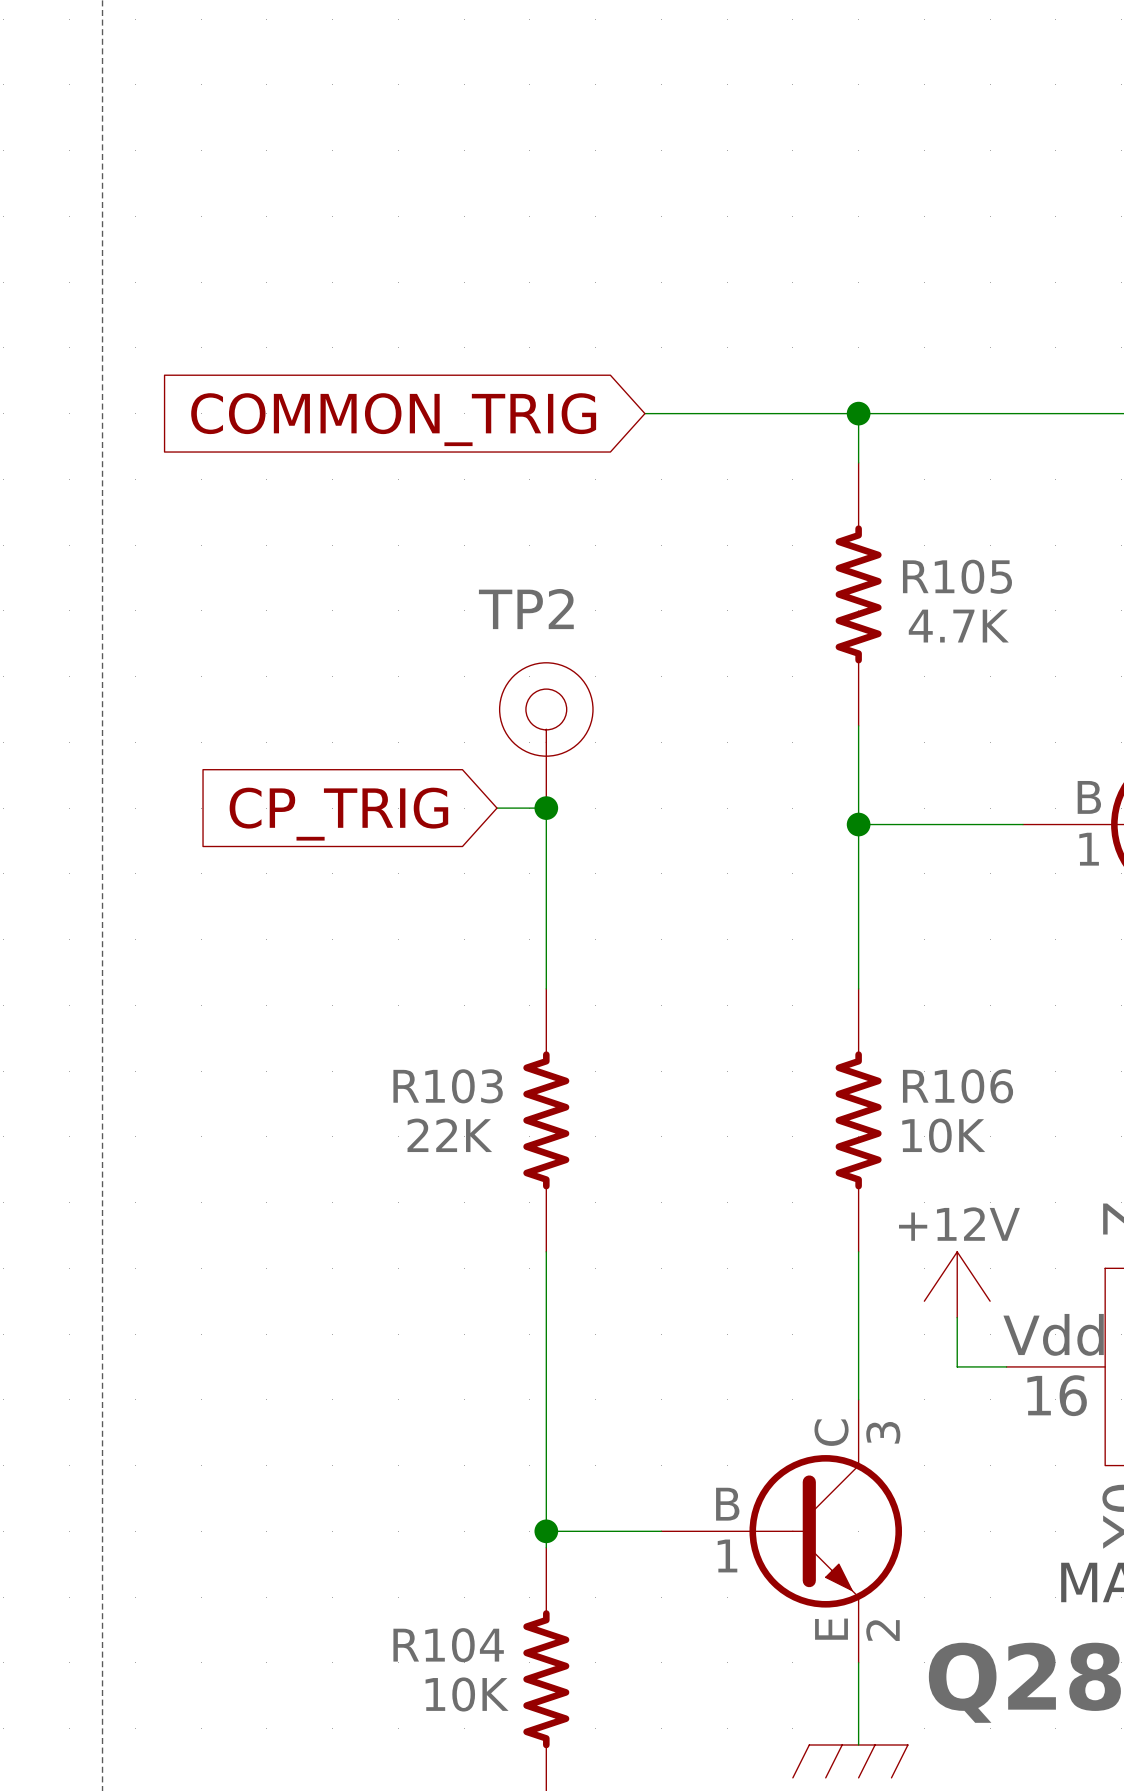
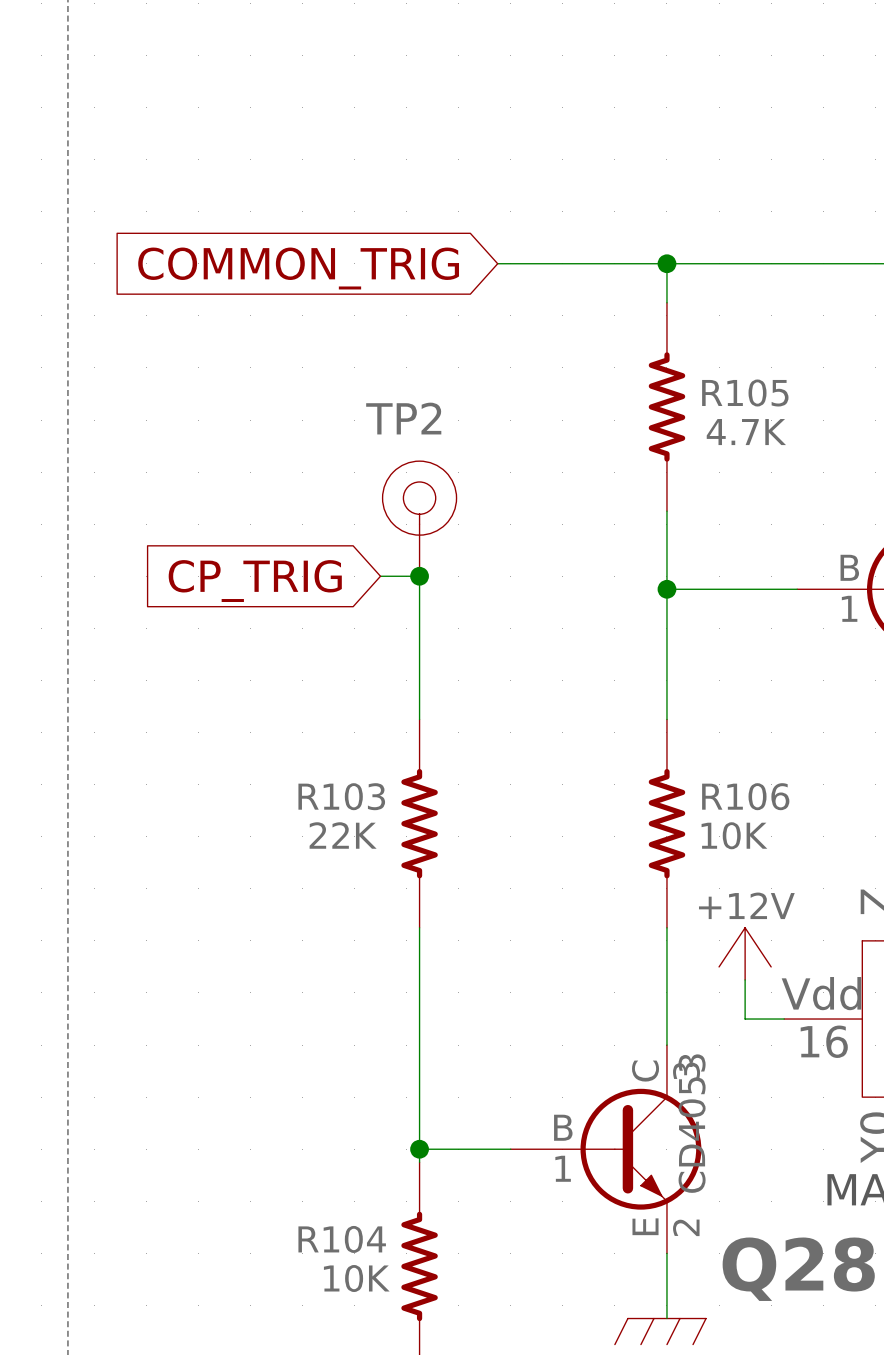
part value: none -> CD4053 (692, 1123)

